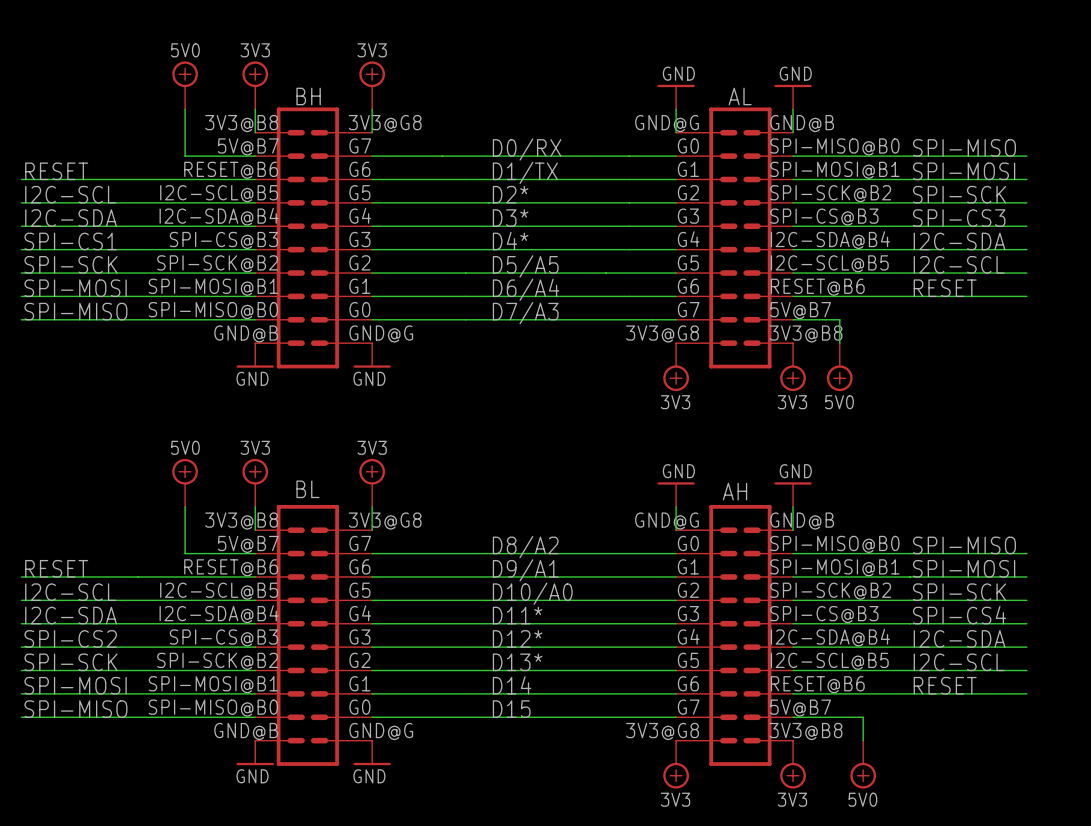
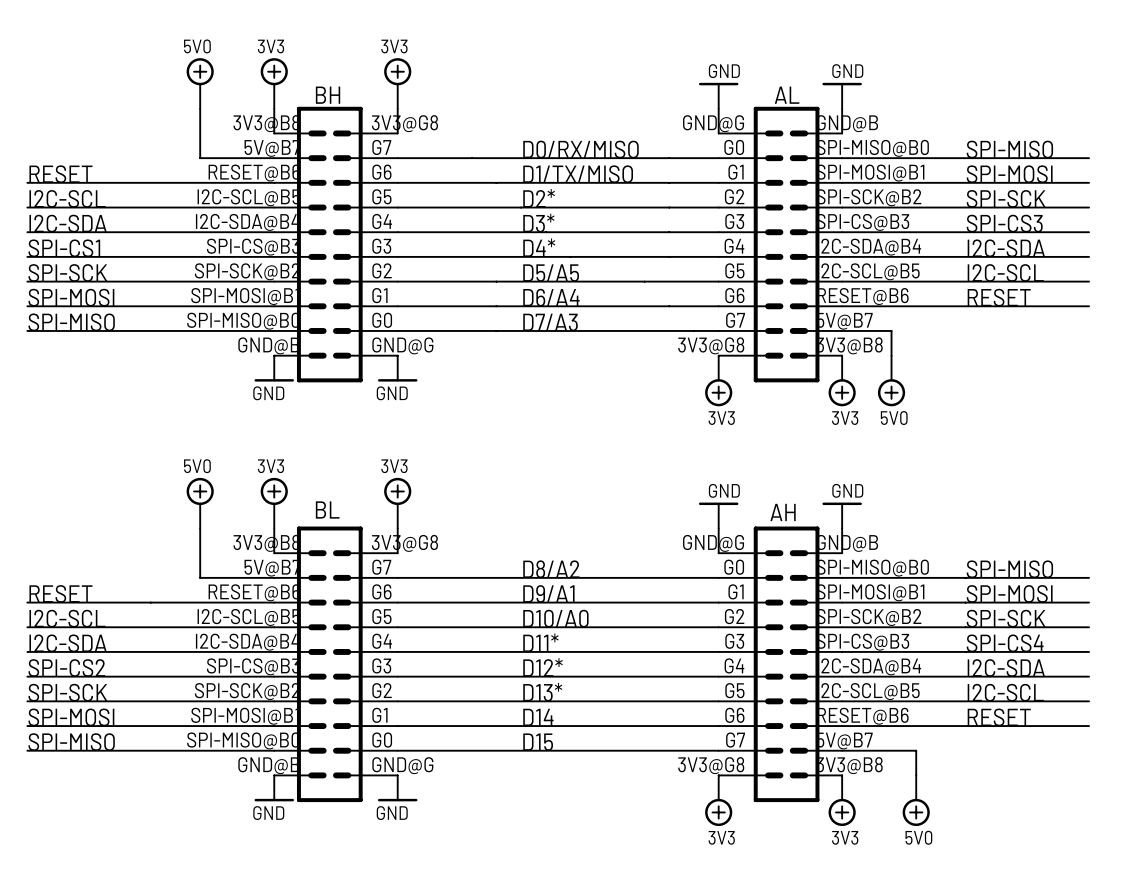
label: D0/RX (527, 149) -> D0/RX/MISO (581, 149)
label: D1/TX (525, 172) -> D1/TX/MISO (578, 174)

